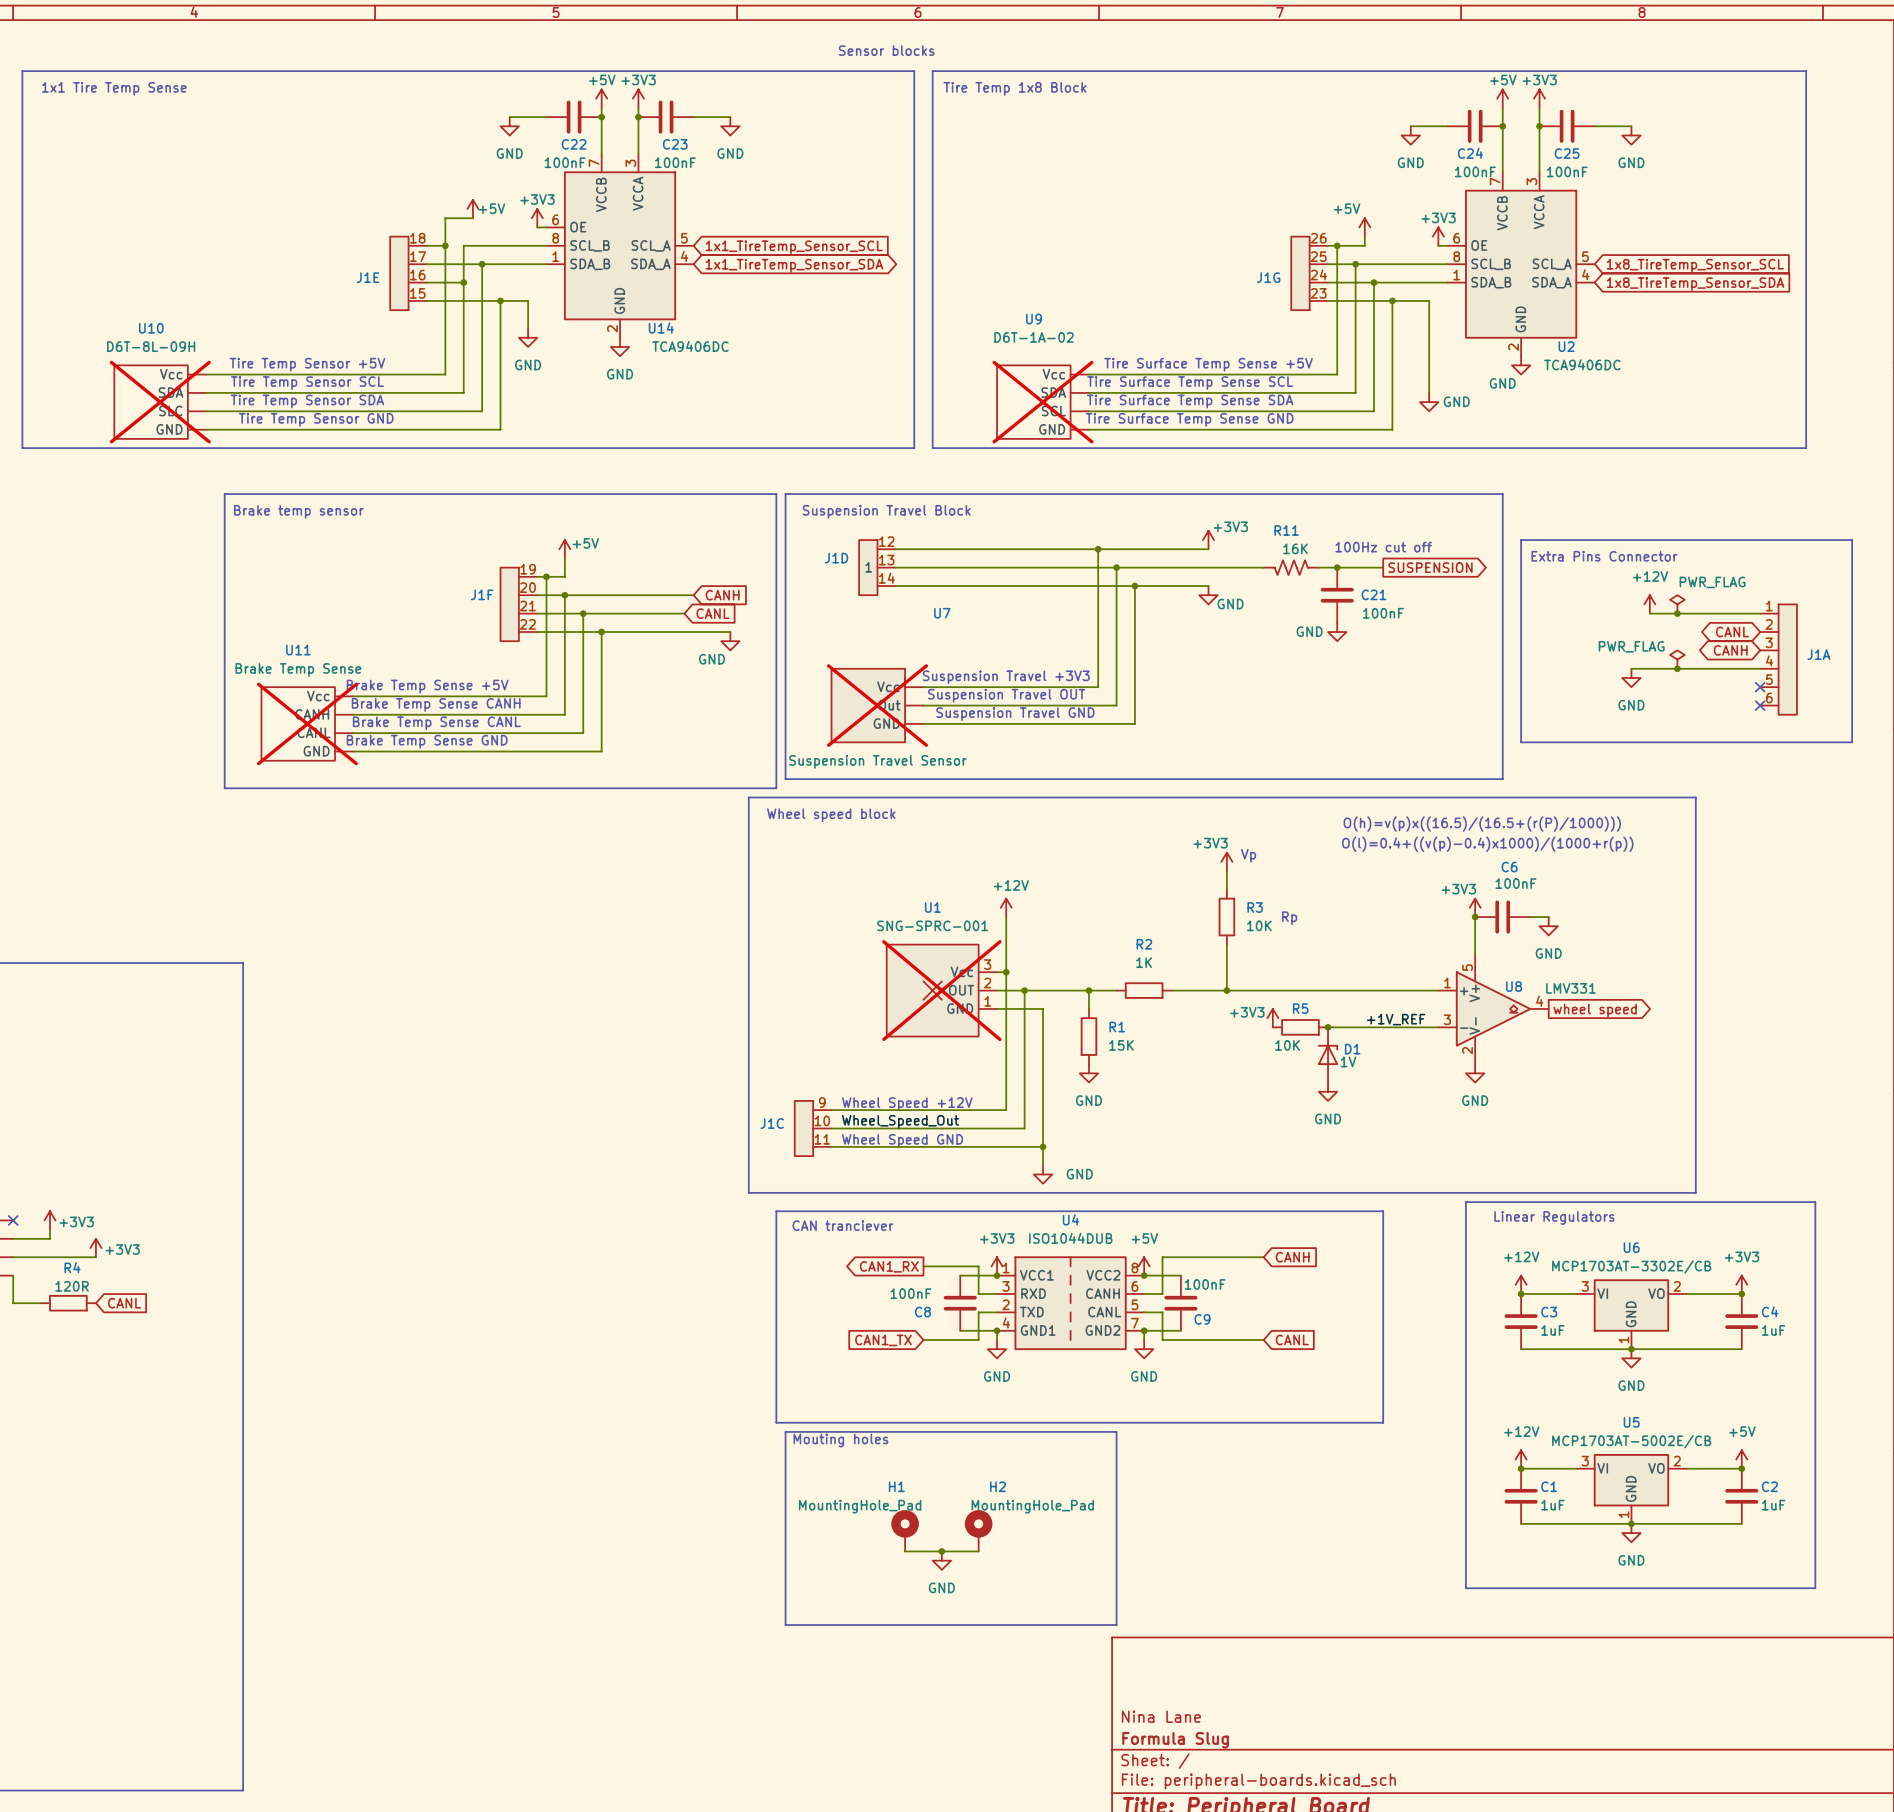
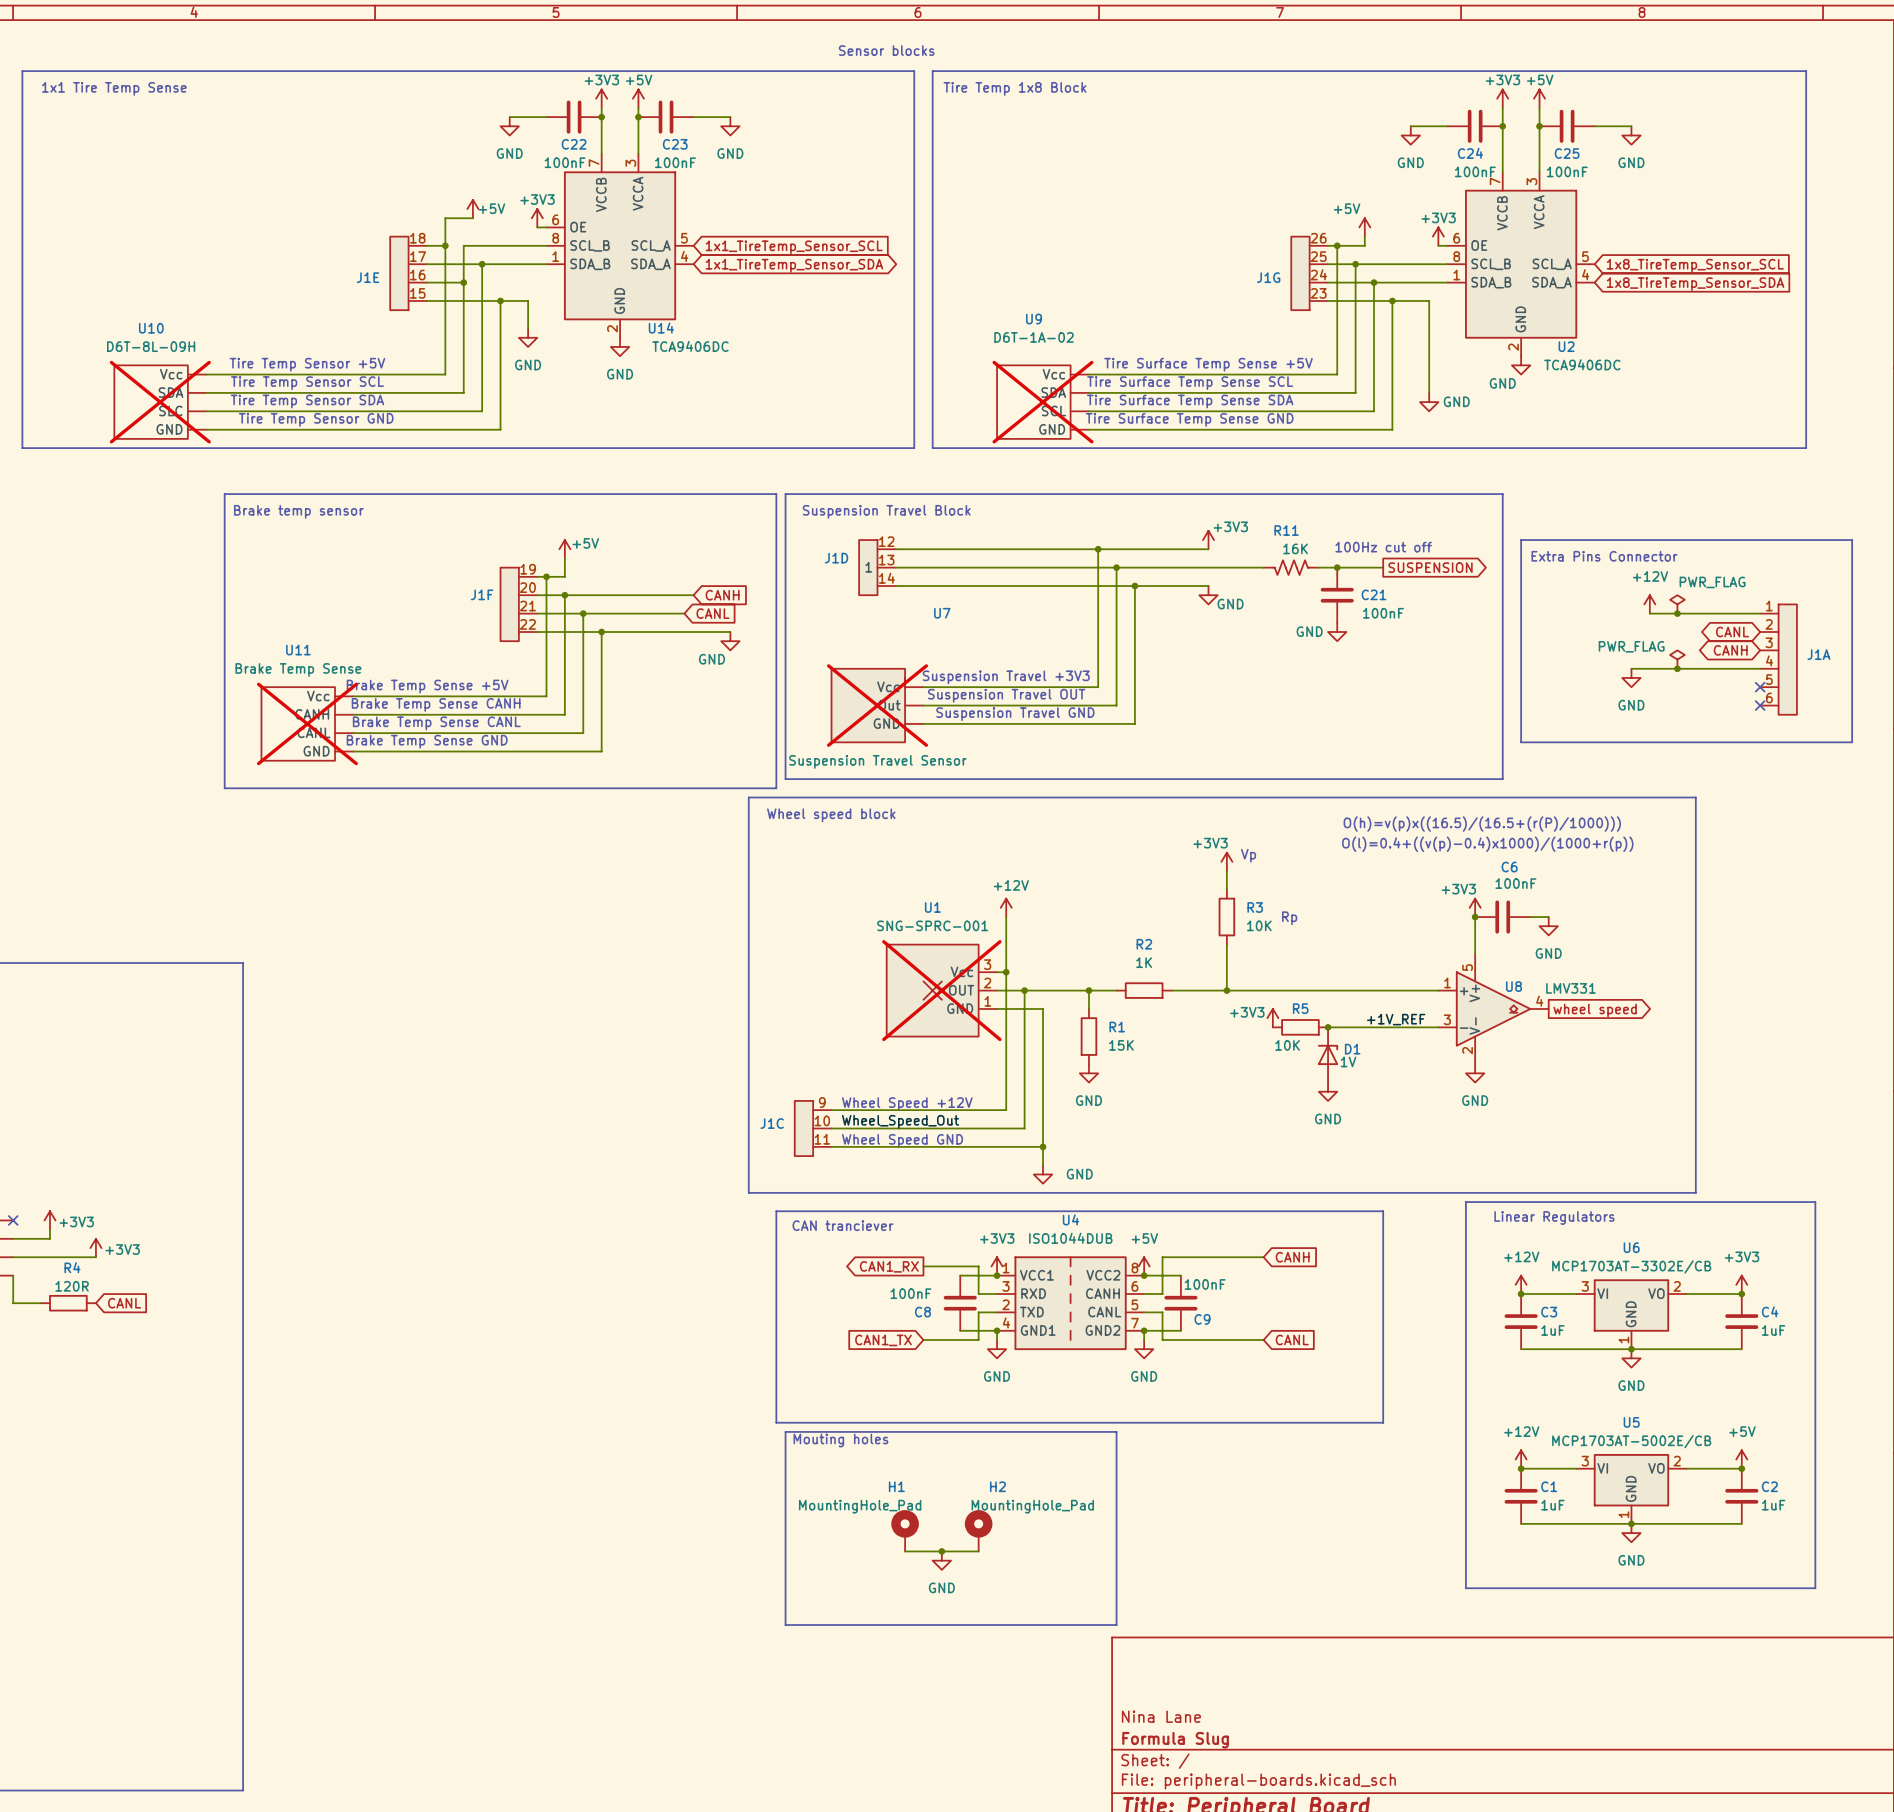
power symbol: +5V (601, 98) -> +3V3 (601, 98)
power symbol: +3V3 (638, 98) -> +5V (638, 98)
power symbol: +5V (1502, 98) -> +3V3 (1502, 98)
power symbol: +3V3 (1539, 98) -> +5V (1539, 98)

